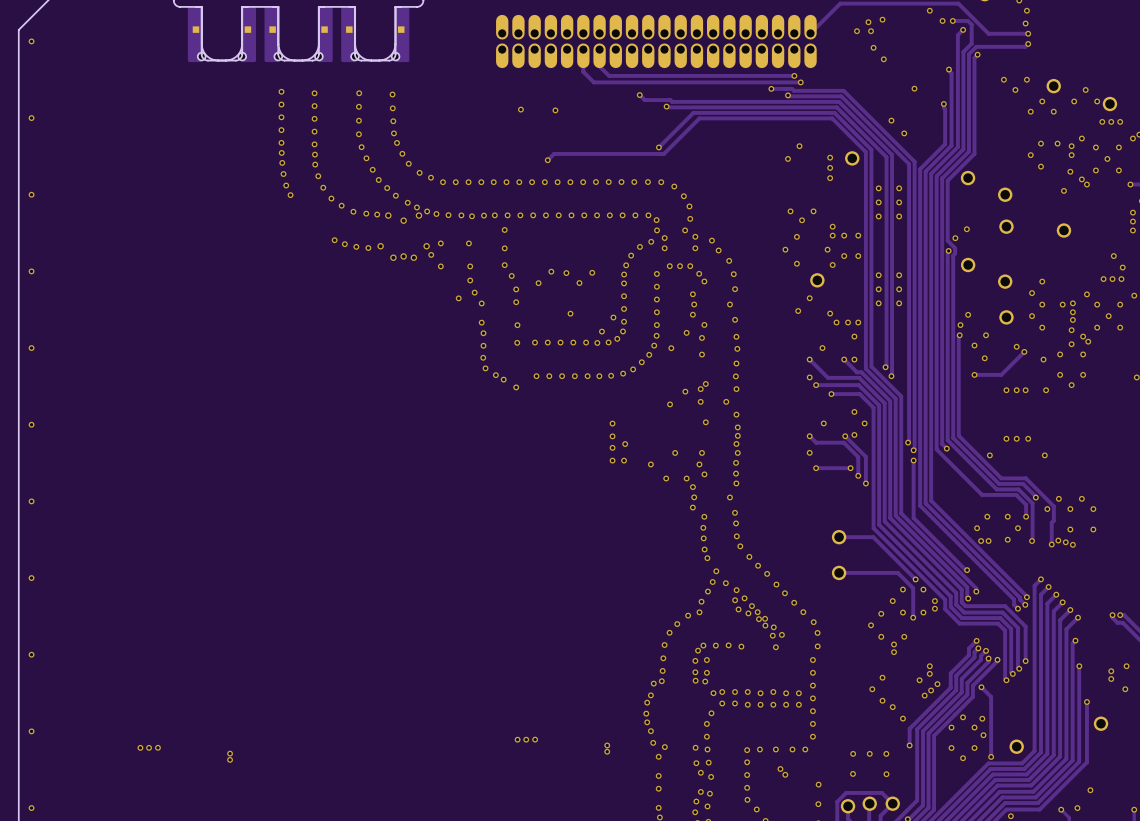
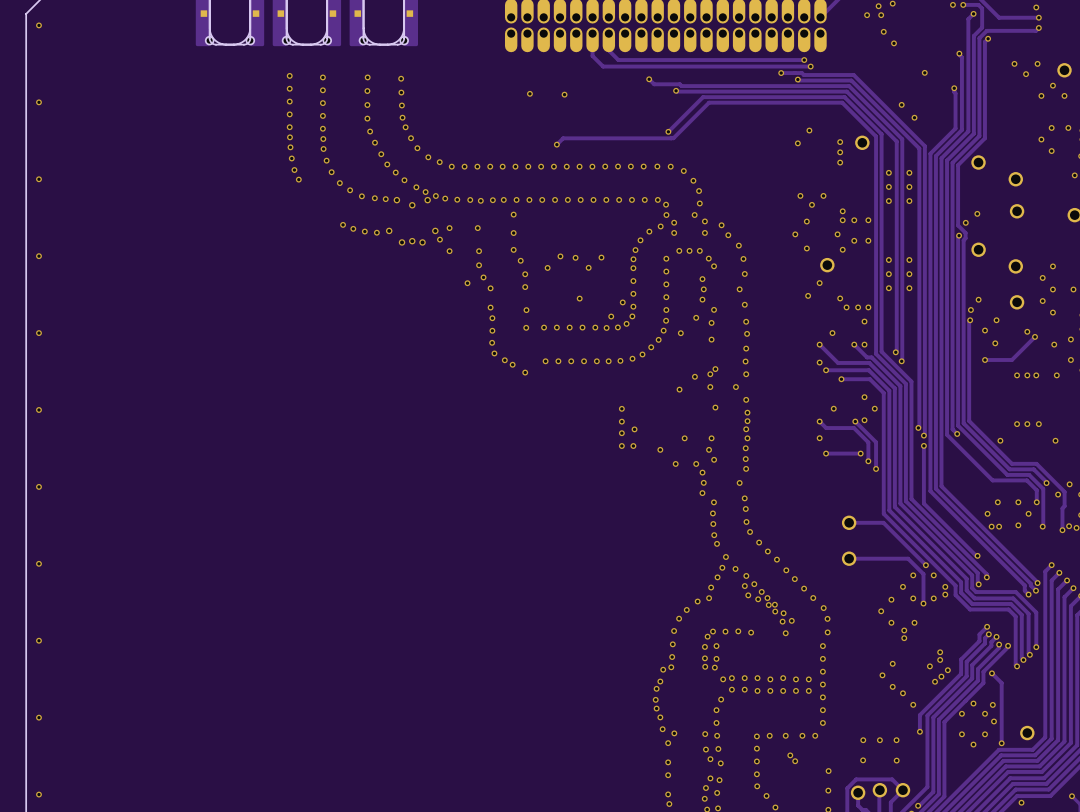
via: (517, 739) -> none
via: (526, 739) -> none
via: (535, 739) -> none
via: (607, 745) -> none
via: (140, 747) -> none
via: (149, 747) -> none
via: (157, 747) -> none
via: (607, 751) -> none
via: (230, 753) -> none
via: (230, 759) -> none

